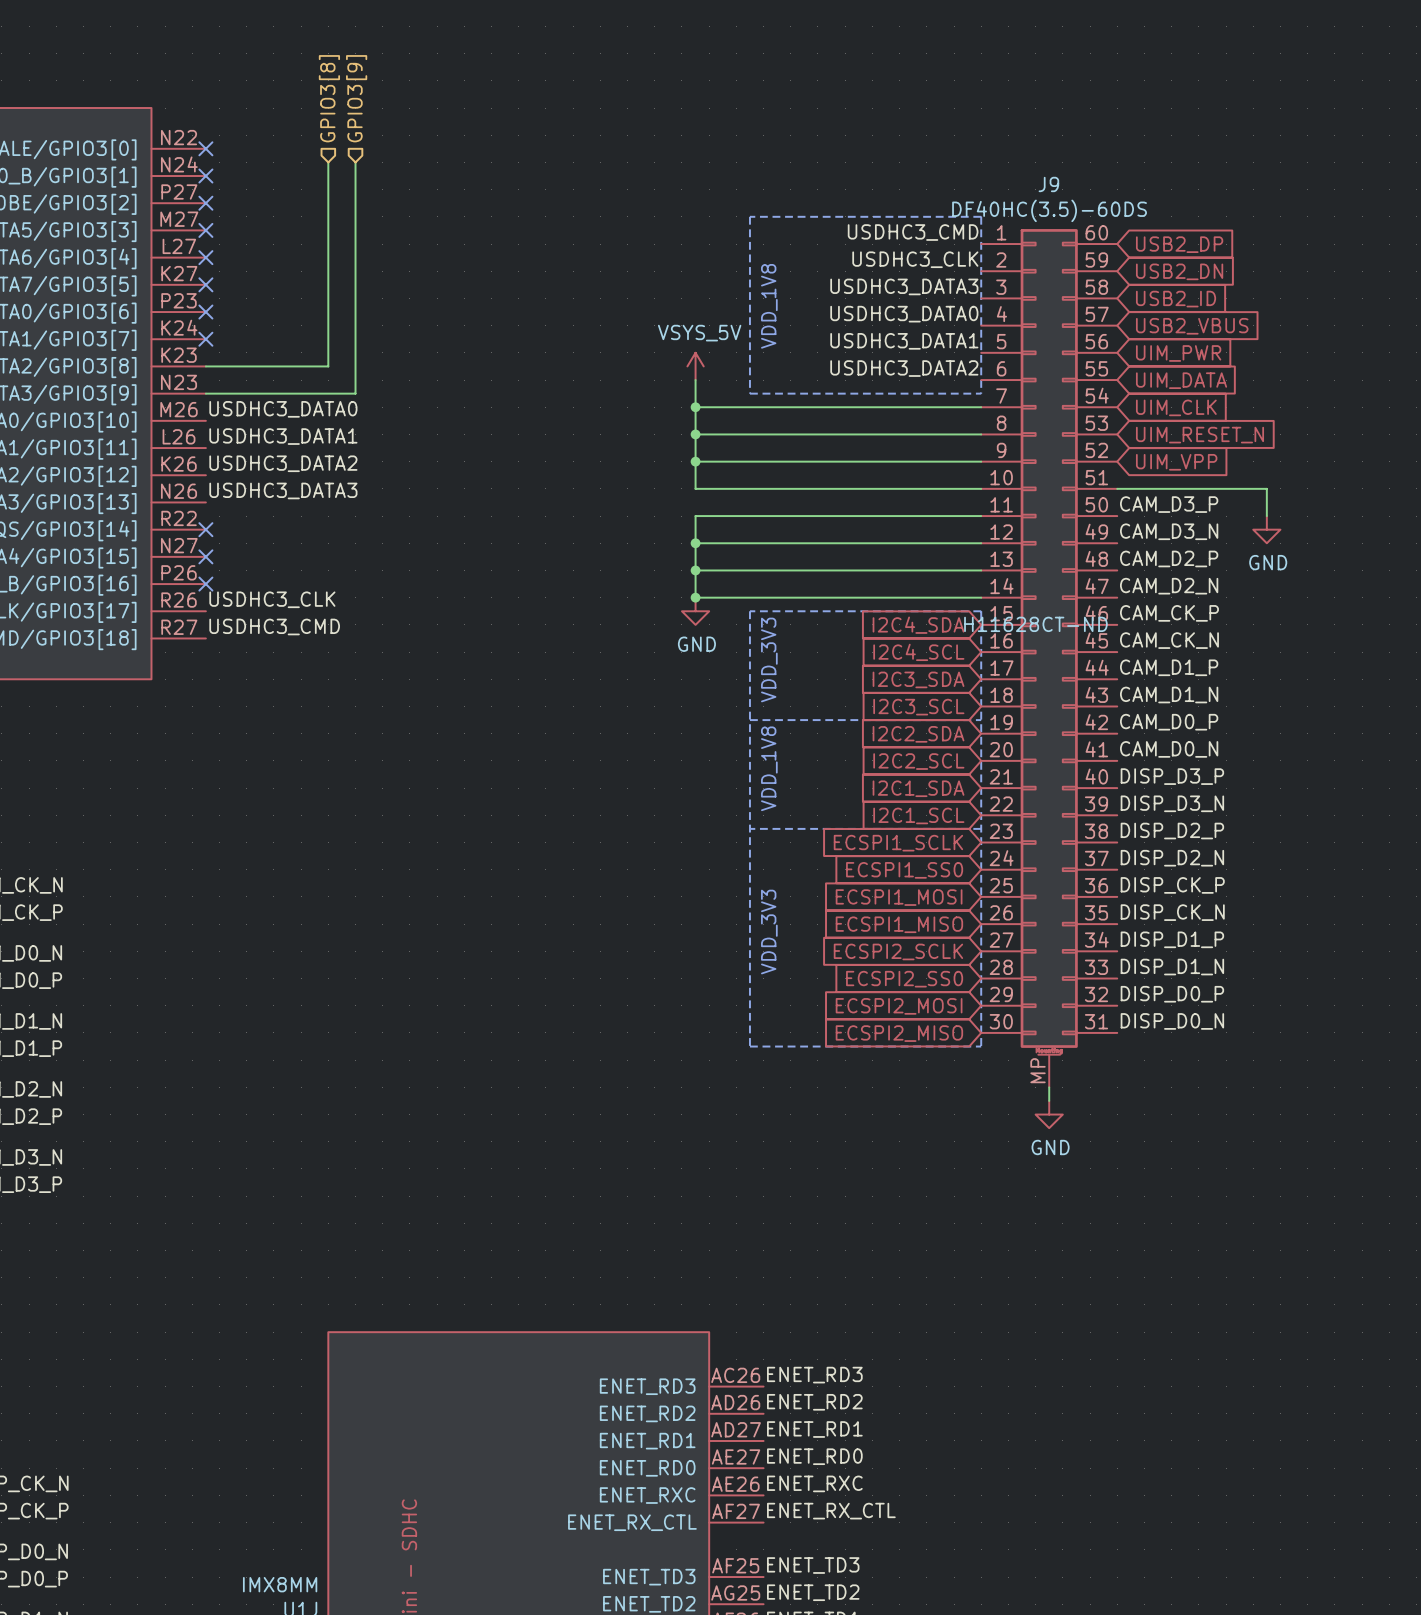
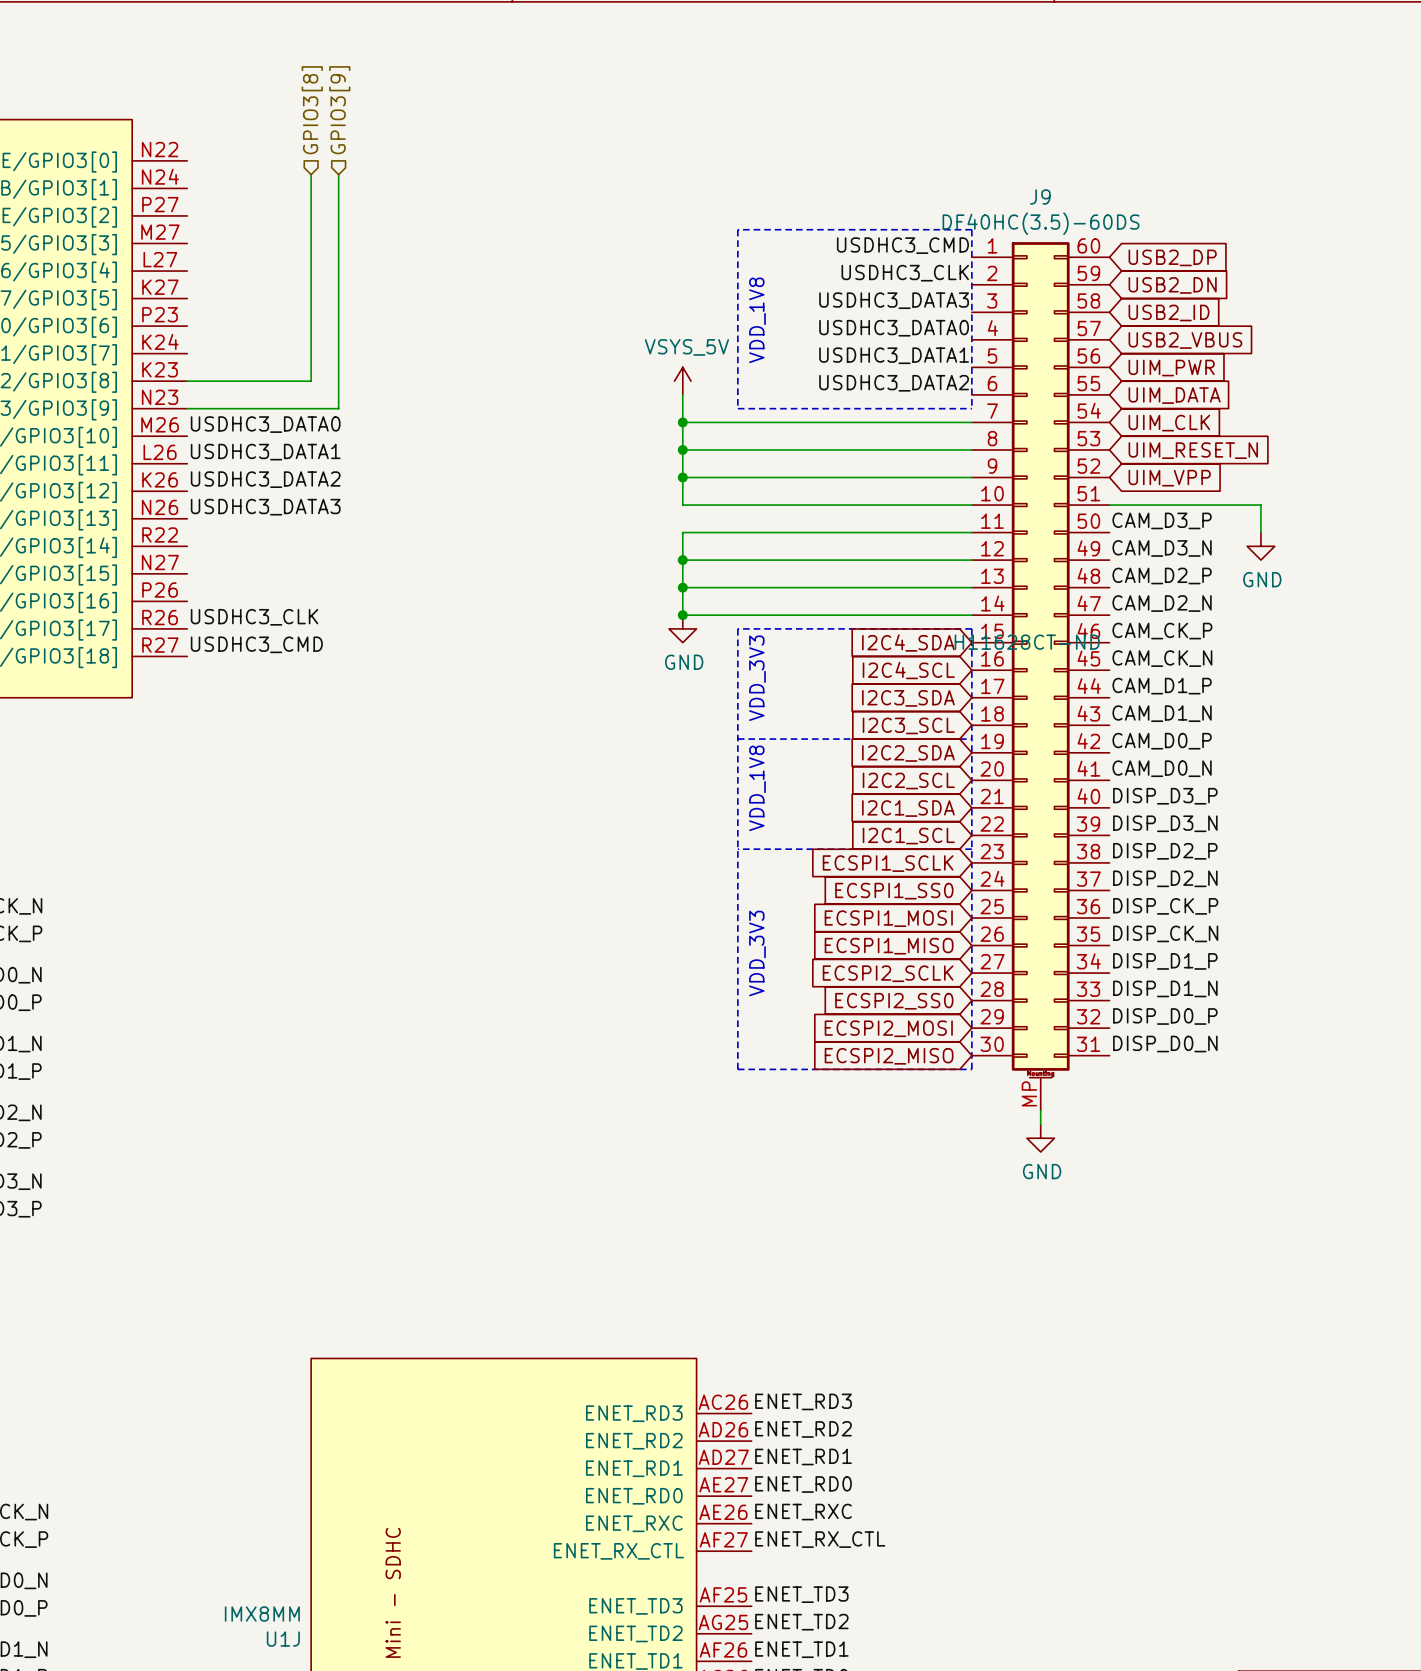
no-connect mark: (205, 148) -> none
no-connect mark: (205, 176) -> none
no-connect mark: (205, 203) -> none
no-connect mark: (205, 230) -> none
no-connect mark: (205, 257) -> none
no-connect mark: (205, 284) -> none
no-connect mark: (205, 312) -> none
no-connect mark: (205, 339) -> none
no-connect mark: (205, 529) -> none
no-connect mark: (205, 556) -> none
no-connect mark: (205, 584) -> none

